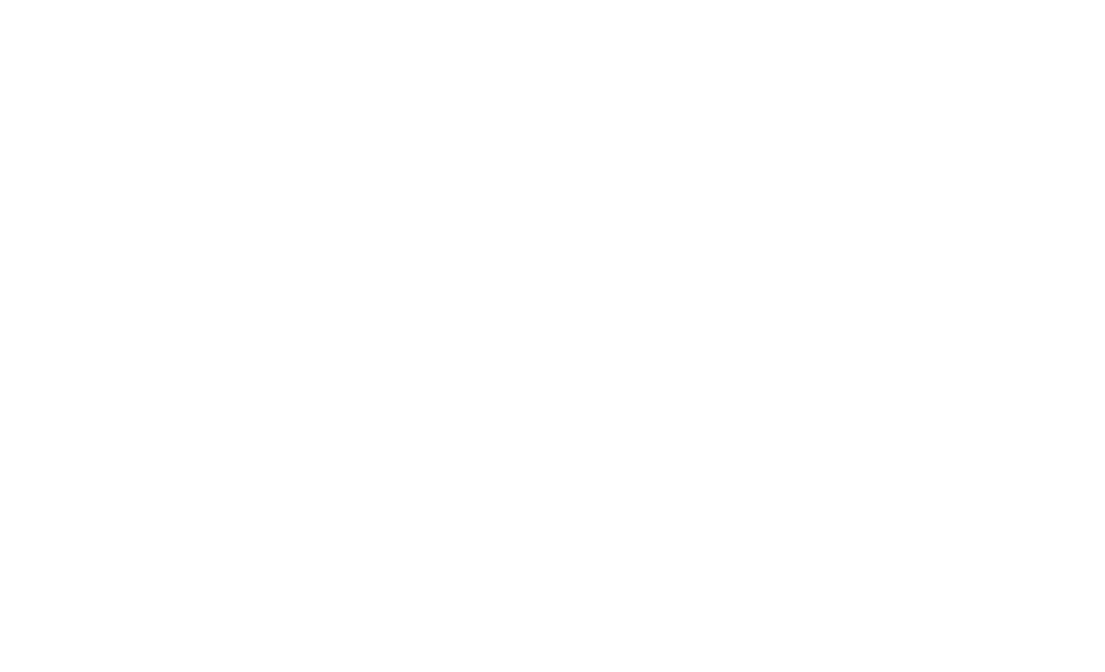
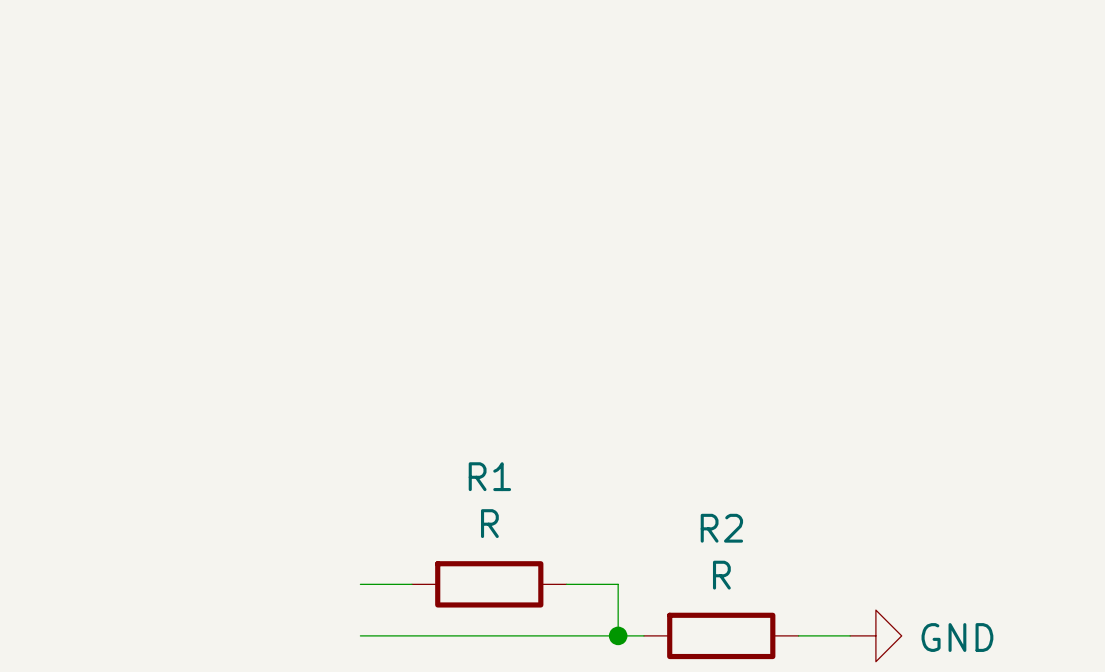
wire: none -> (360, 584) (411, 584)
R1: none -> R (489, 584)
wire: none -> (566, 584) (618, 584) (618, 635)
wire: none -> (360, 635) (643, 635)
junction: none -> (618, 635)
R2: none -> R (721, 635)
wire: none -> (798, 635) (850, 635)
power symbol: none -> GND (875, 635)

